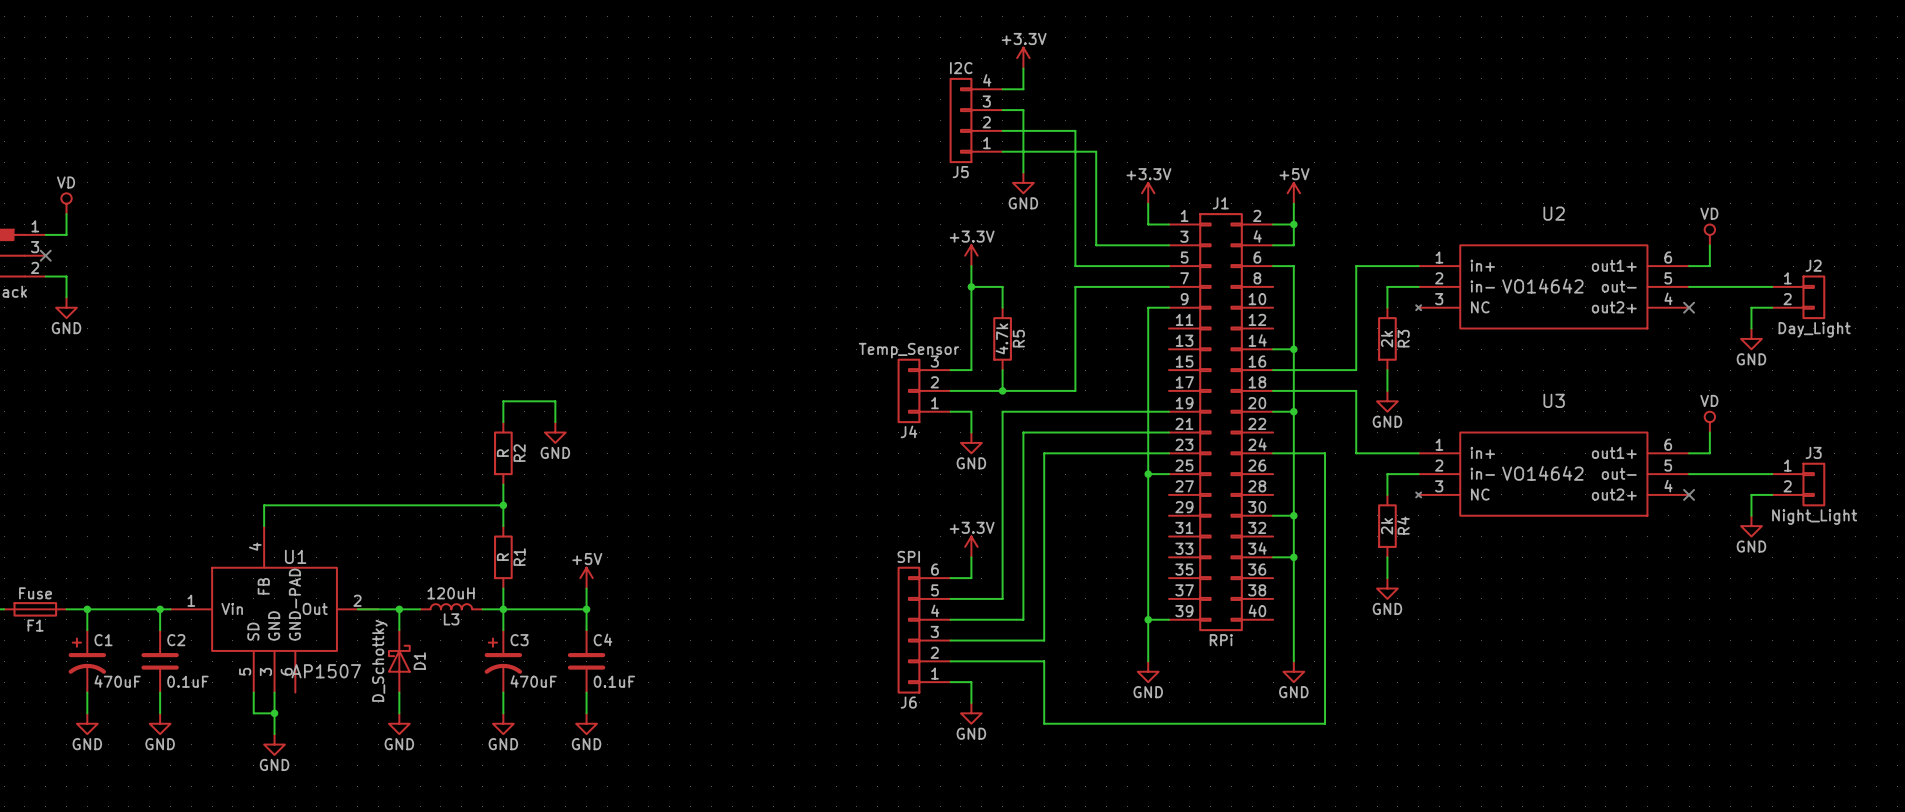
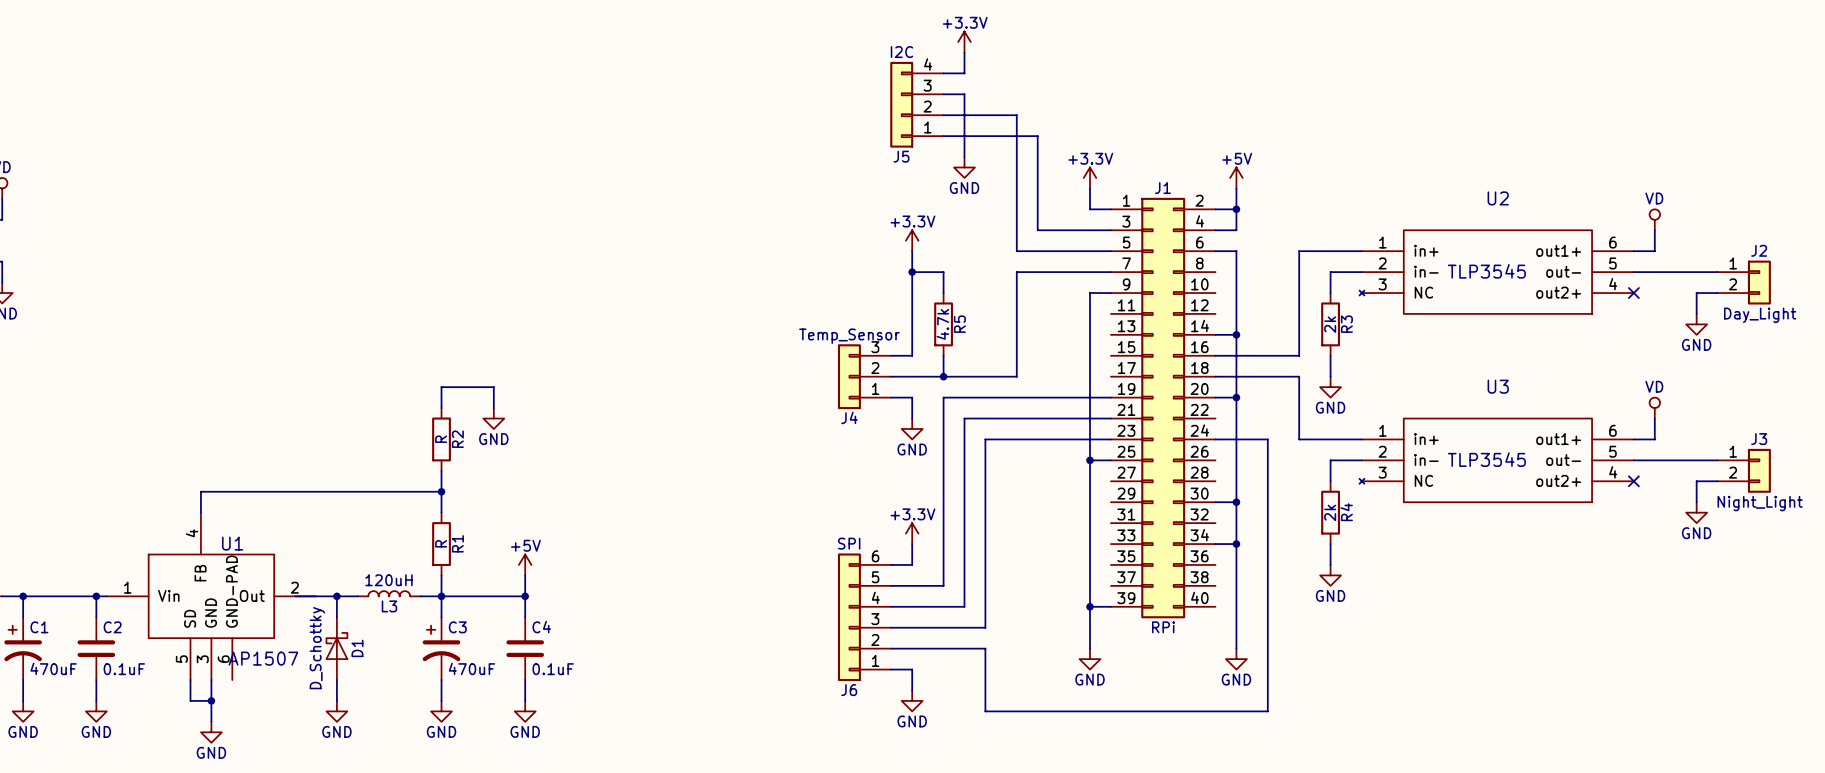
U2 value: VO14642 (1542, 286) -> TLP3545 (1486, 271)
U3 value: VO14642 (1542, 473) -> TLP3545 (1486, 459)

